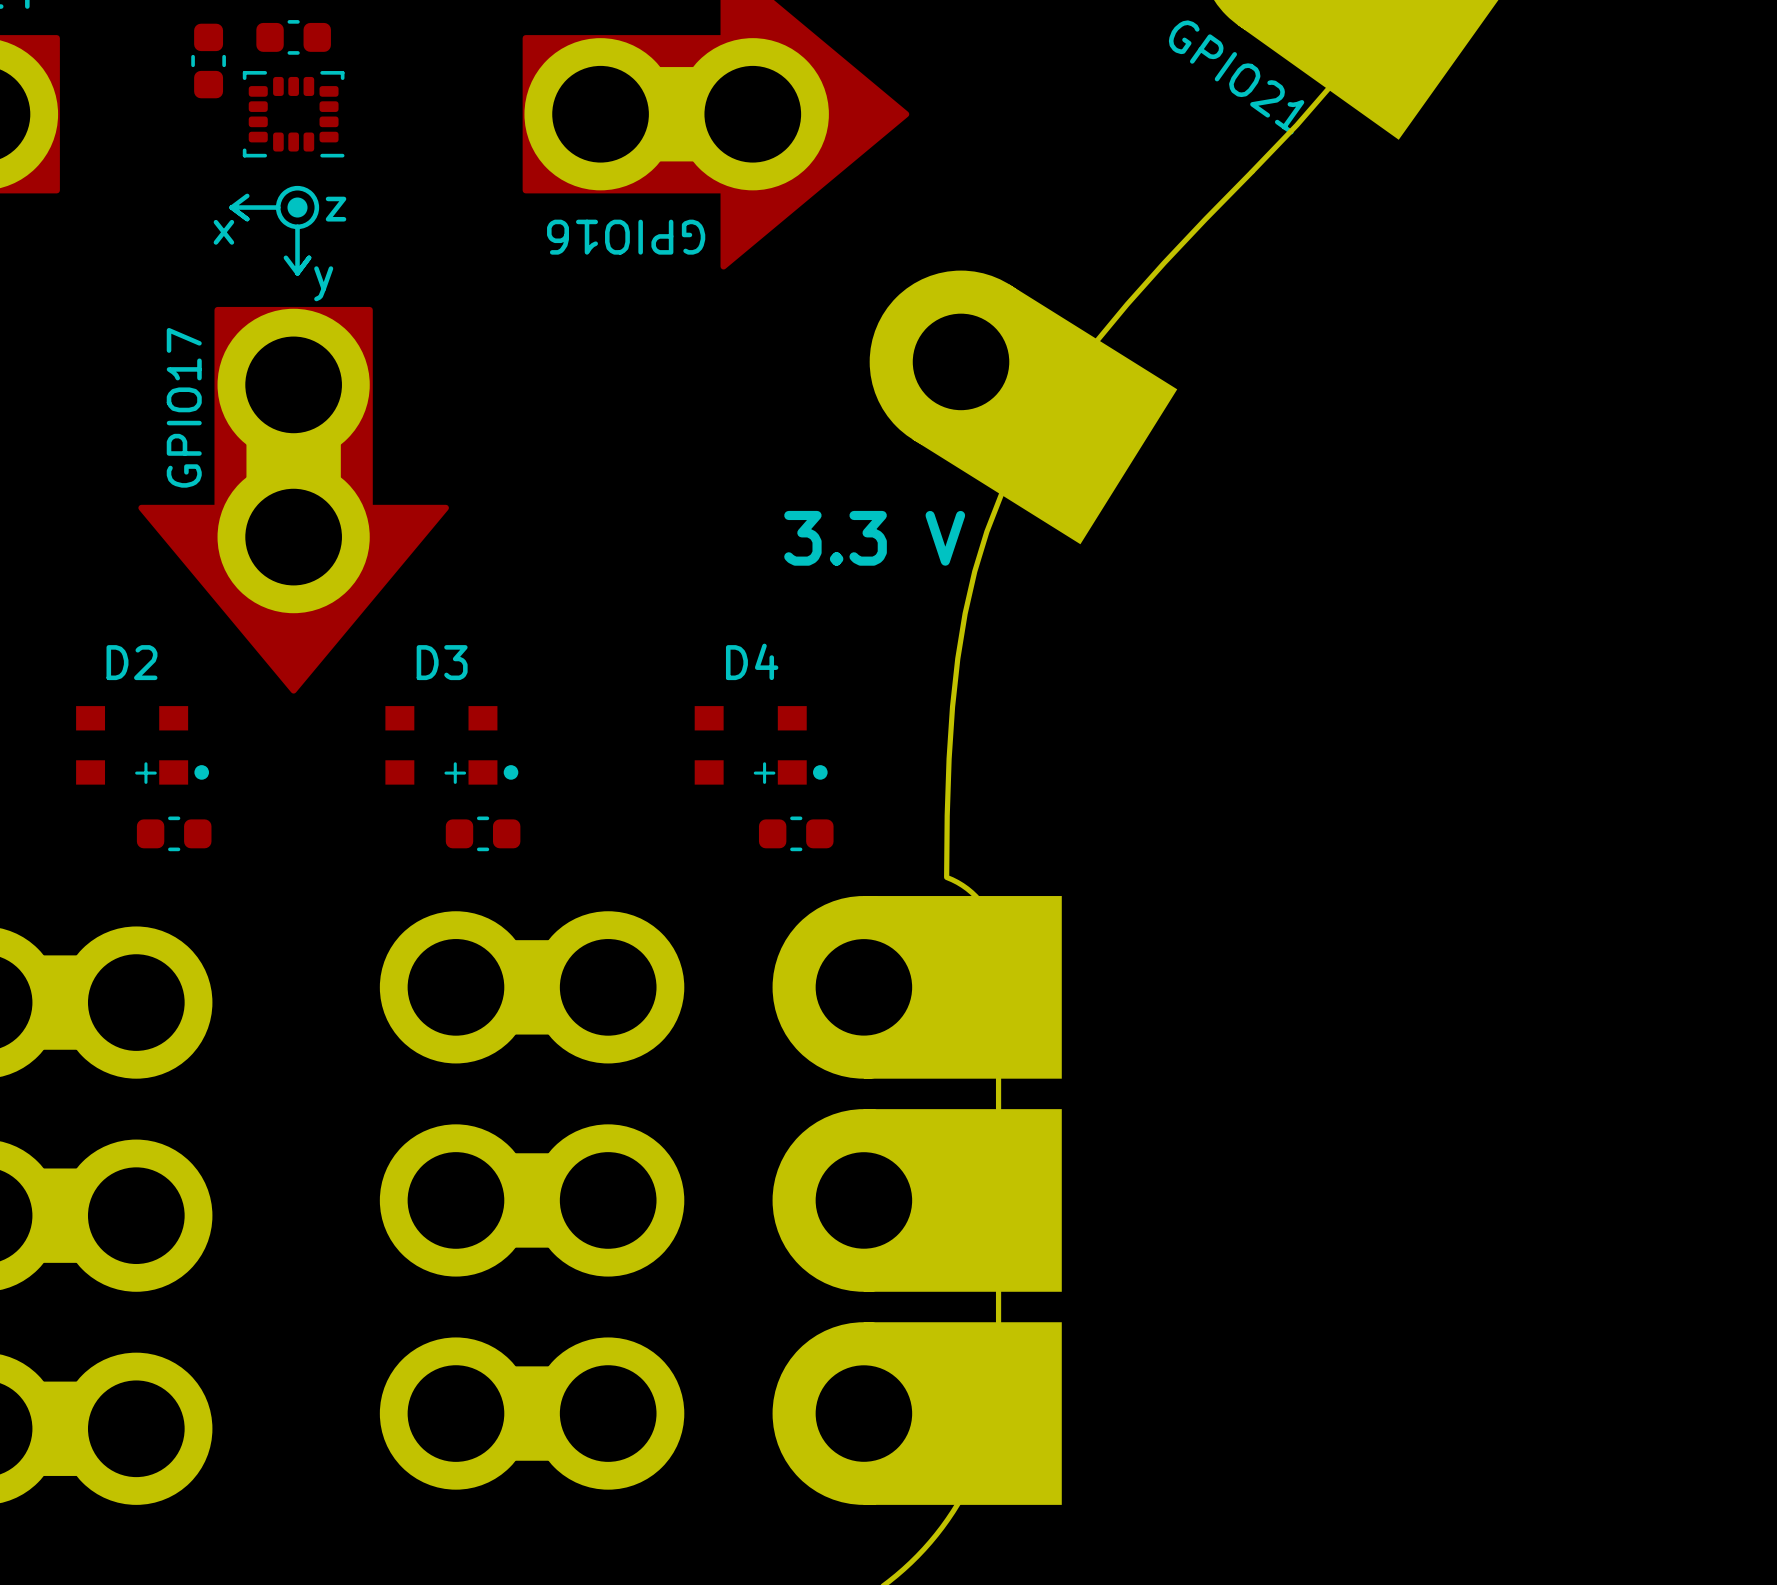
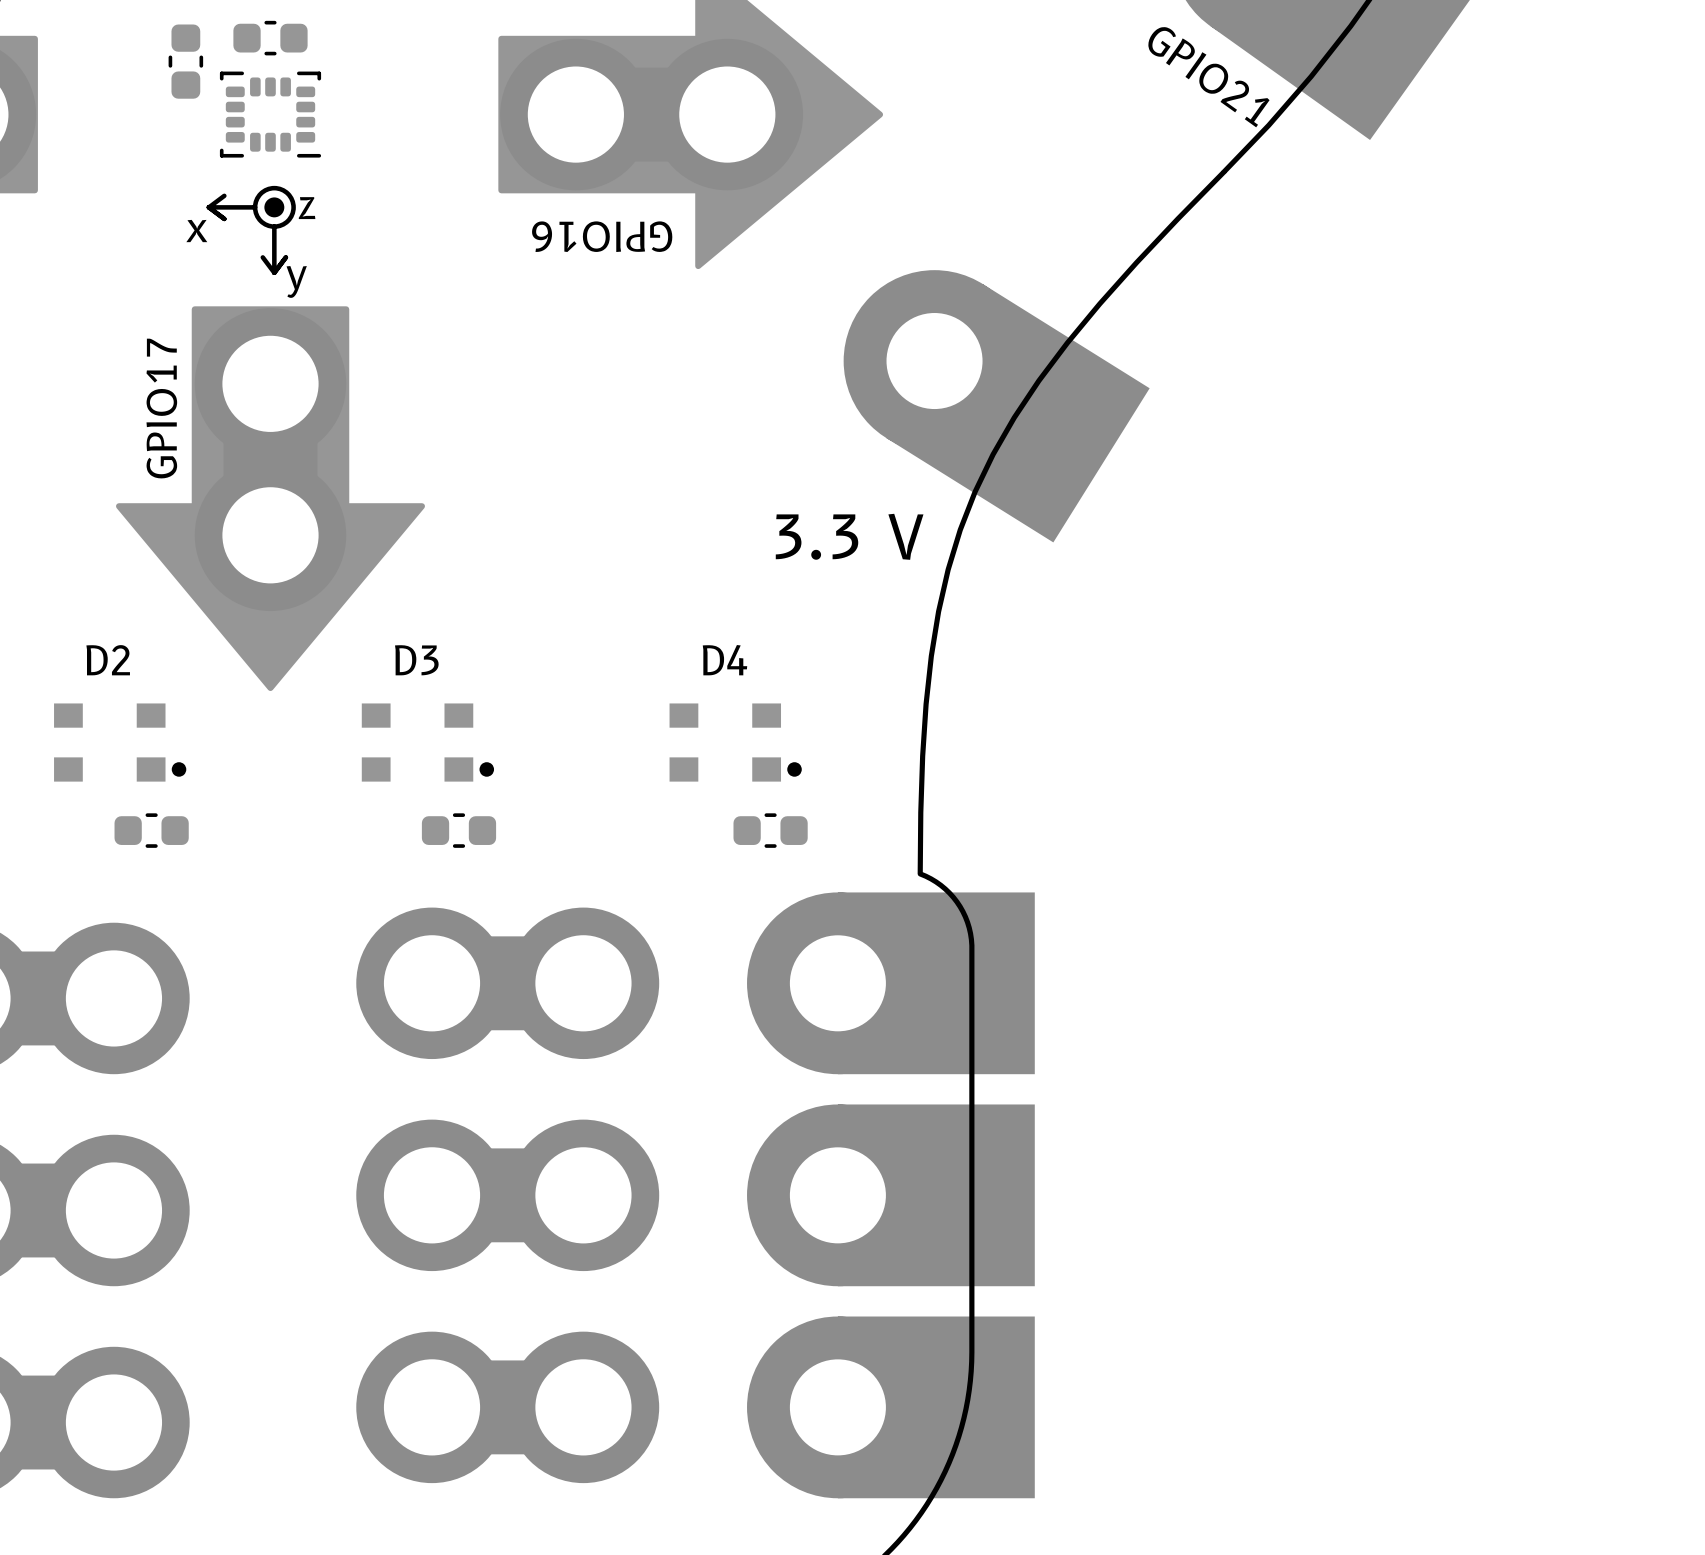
D2 text: + (145, 773) -> none
D3 text: + (455, 773) -> none
D4 text: + (764, 773) -> none

